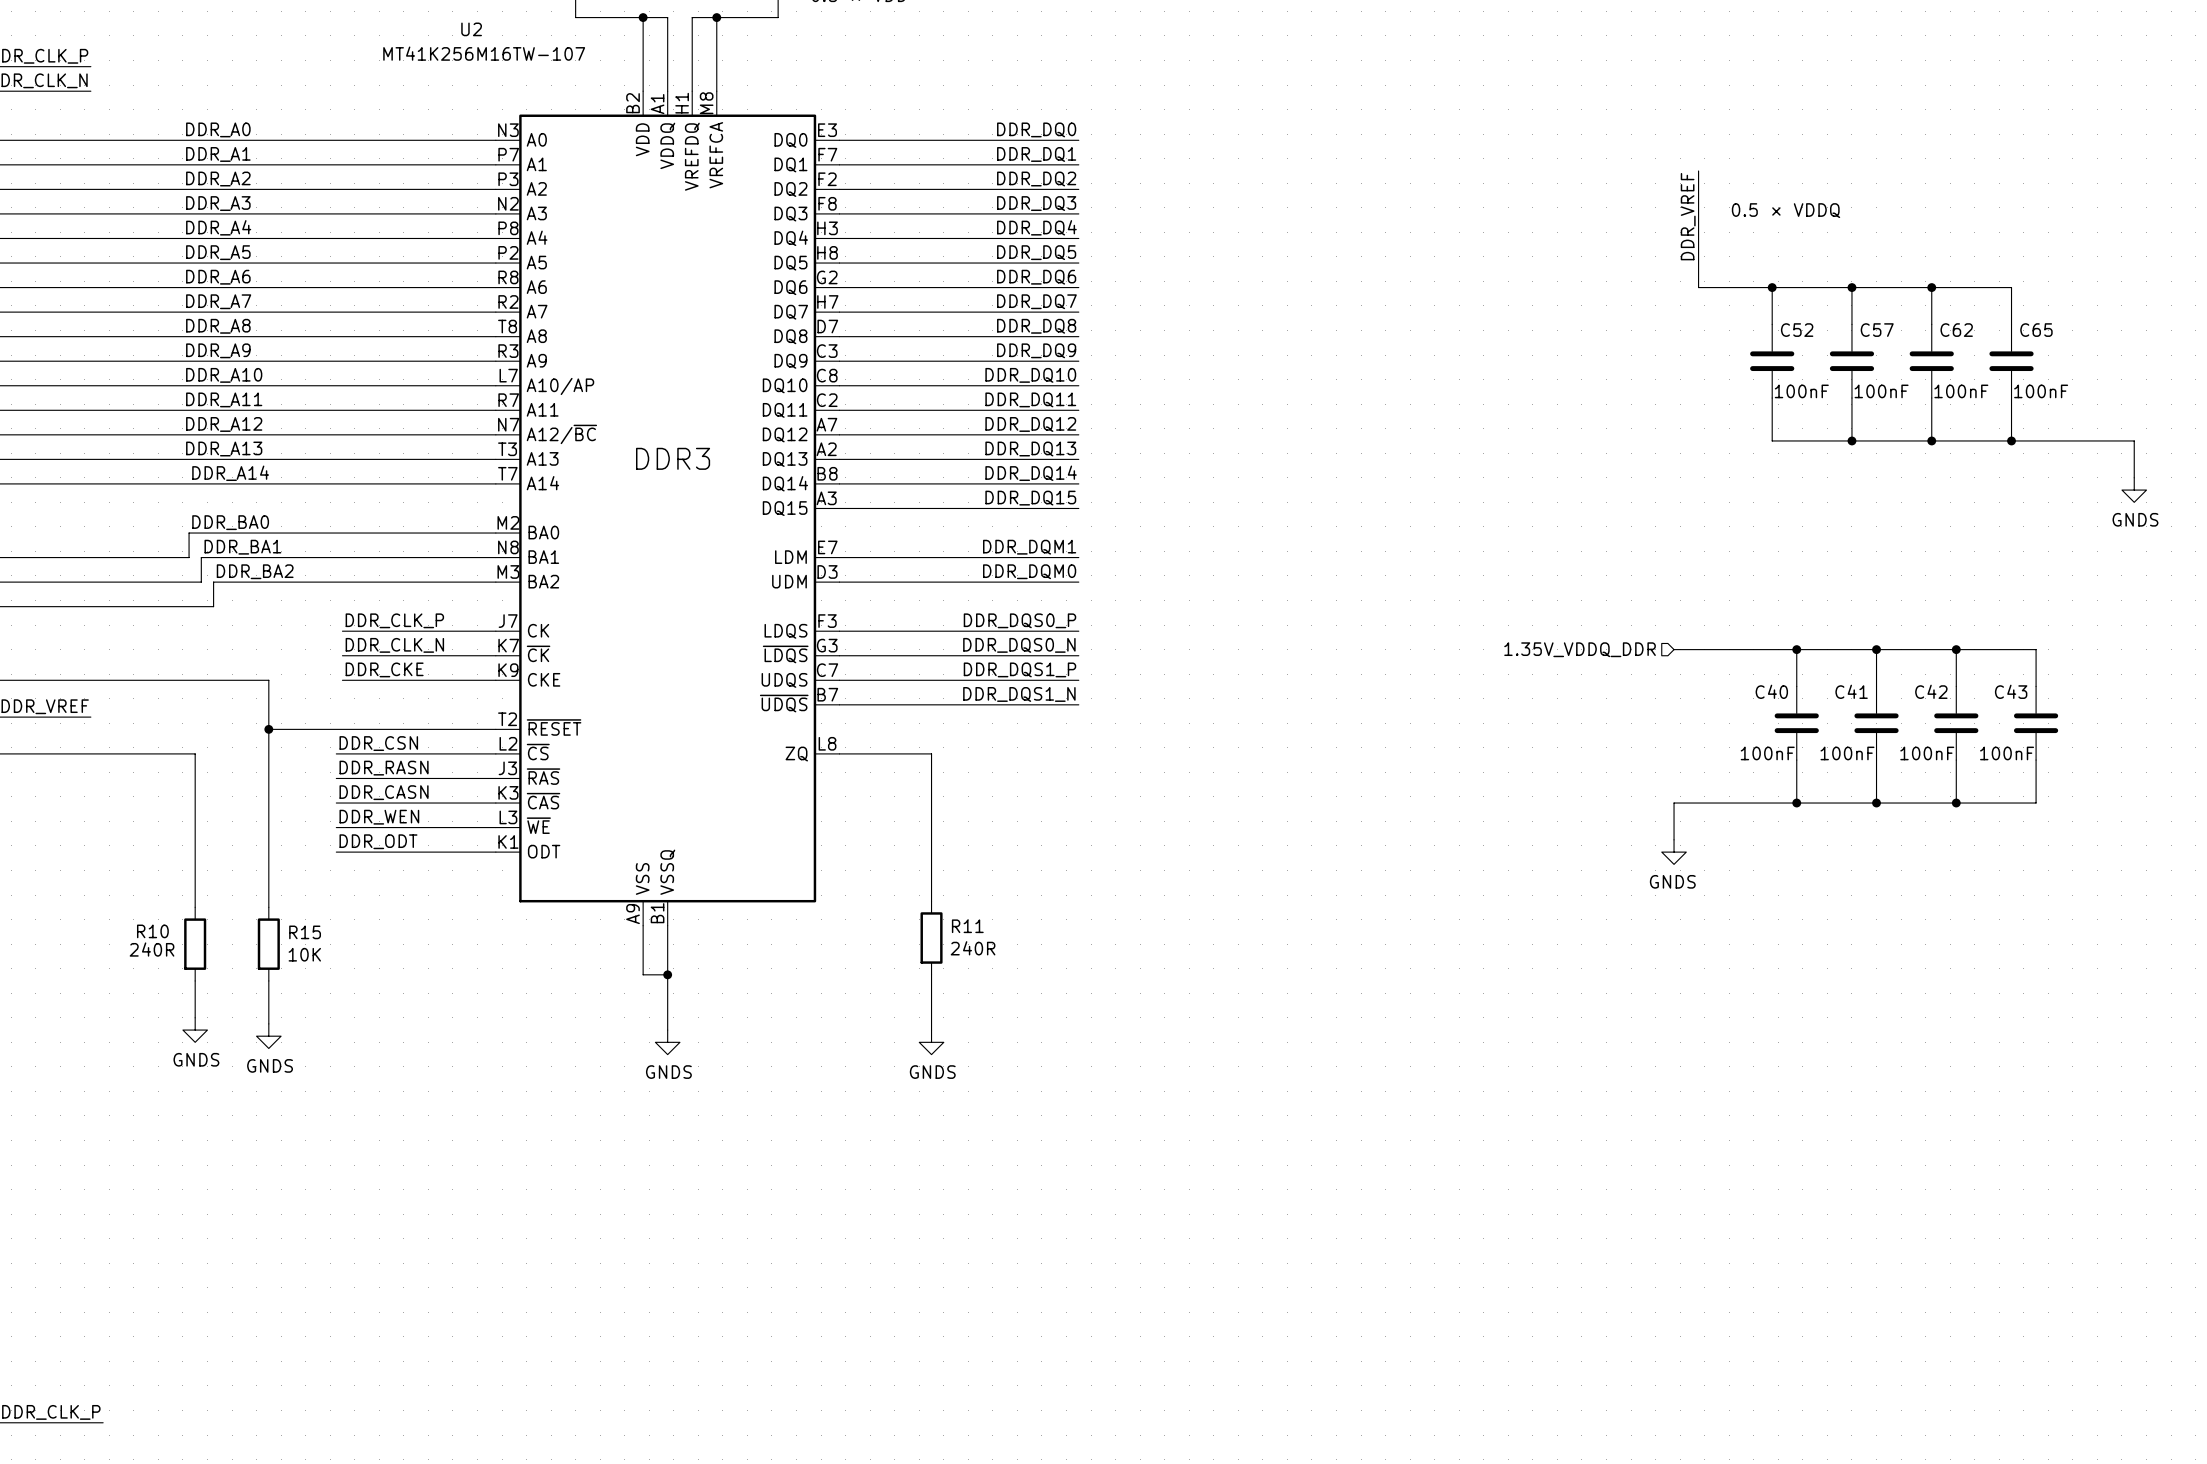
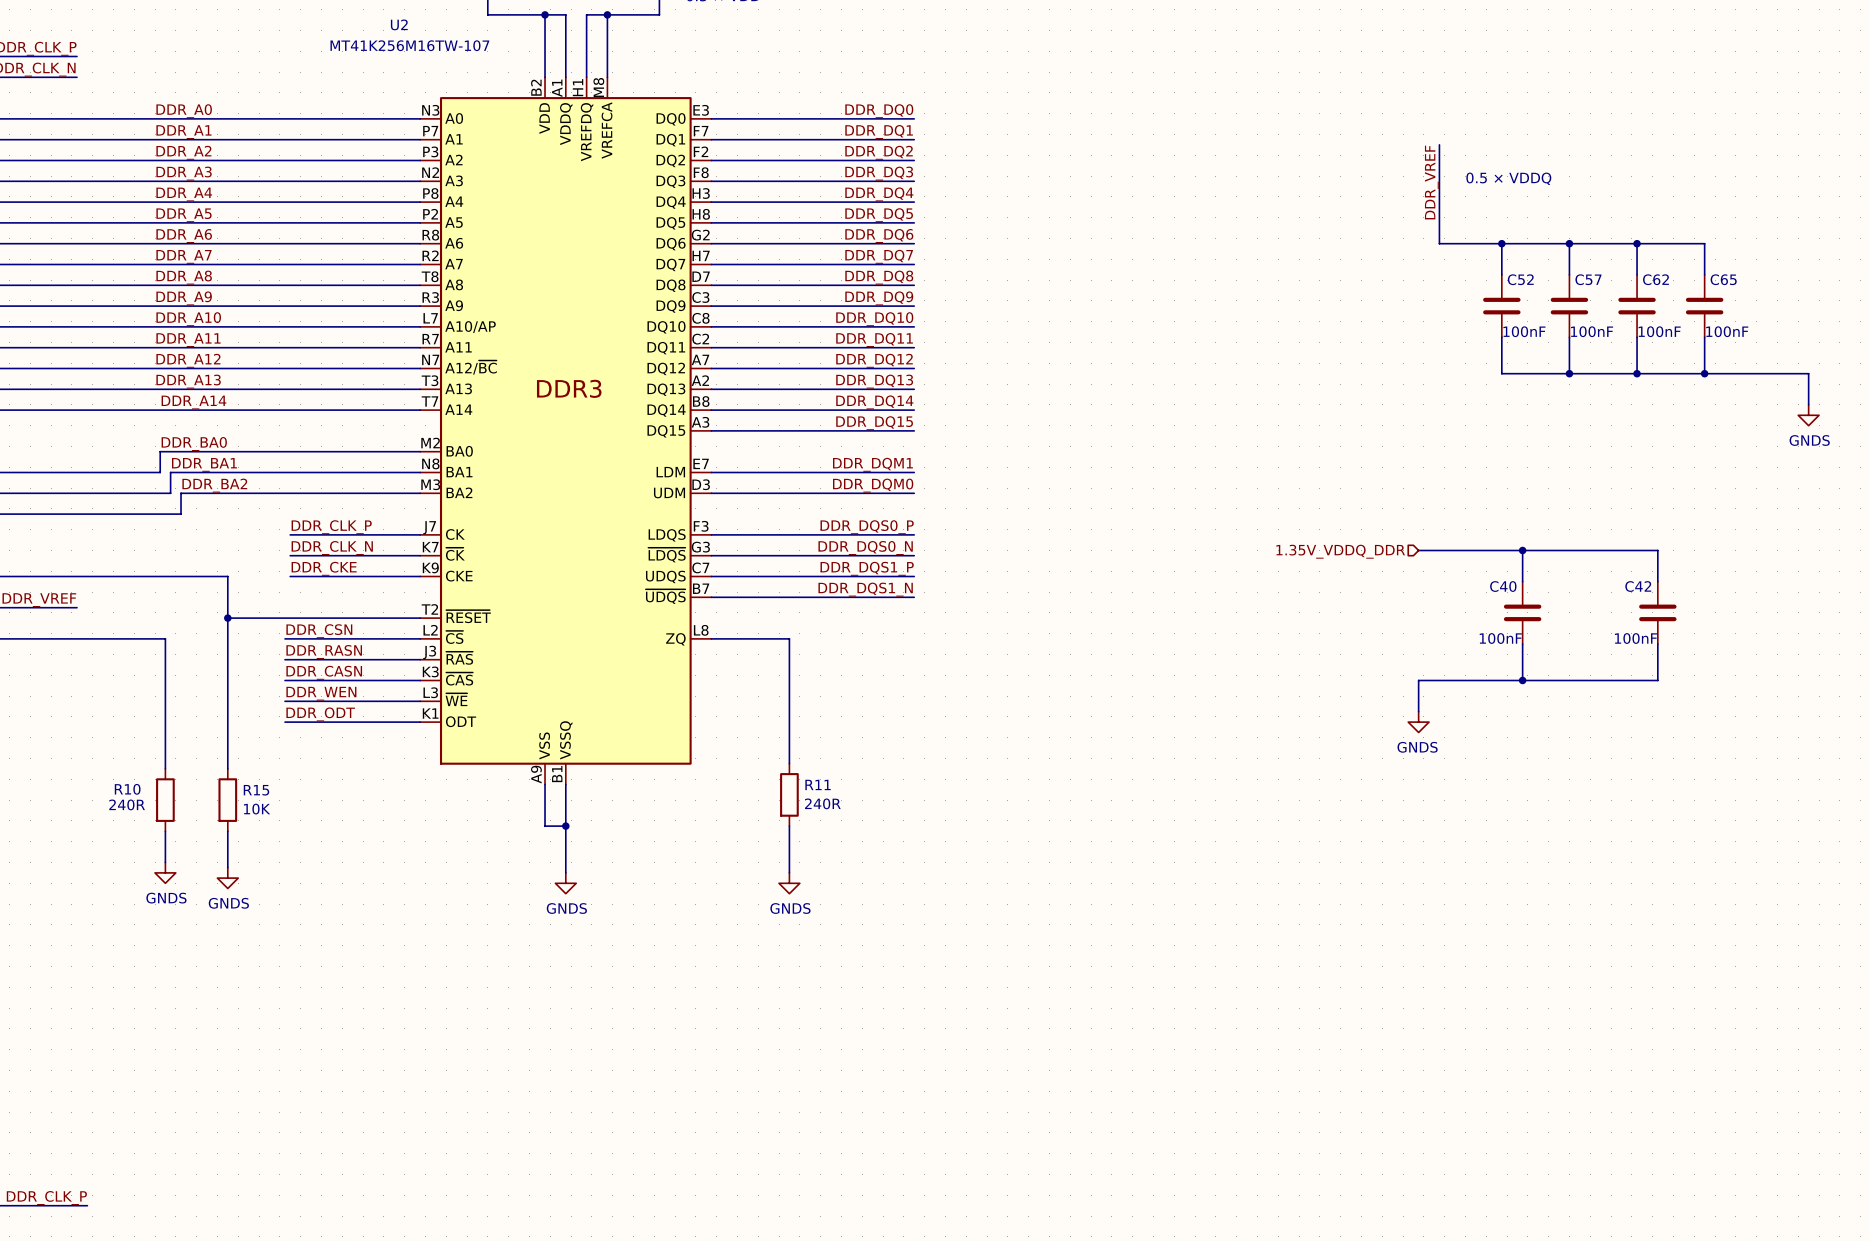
wire: (1876, 649) (1876, 686) -> none
junction: (1876, 649) -> none
wire: (1956, 649) (2036, 649) (2036, 686) -> none
junction: (1956, 649) -> none
C41: 100nF (1876, 723) -> none
C43: 100nF (2036, 723) -> none
wire: (1876, 760) (1876, 803) -> none
wire: (2036, 760) (2036, 803) (1956, 803) -> none
junction: (1876, 803) -> none
junction: (1956, 803) -> none

